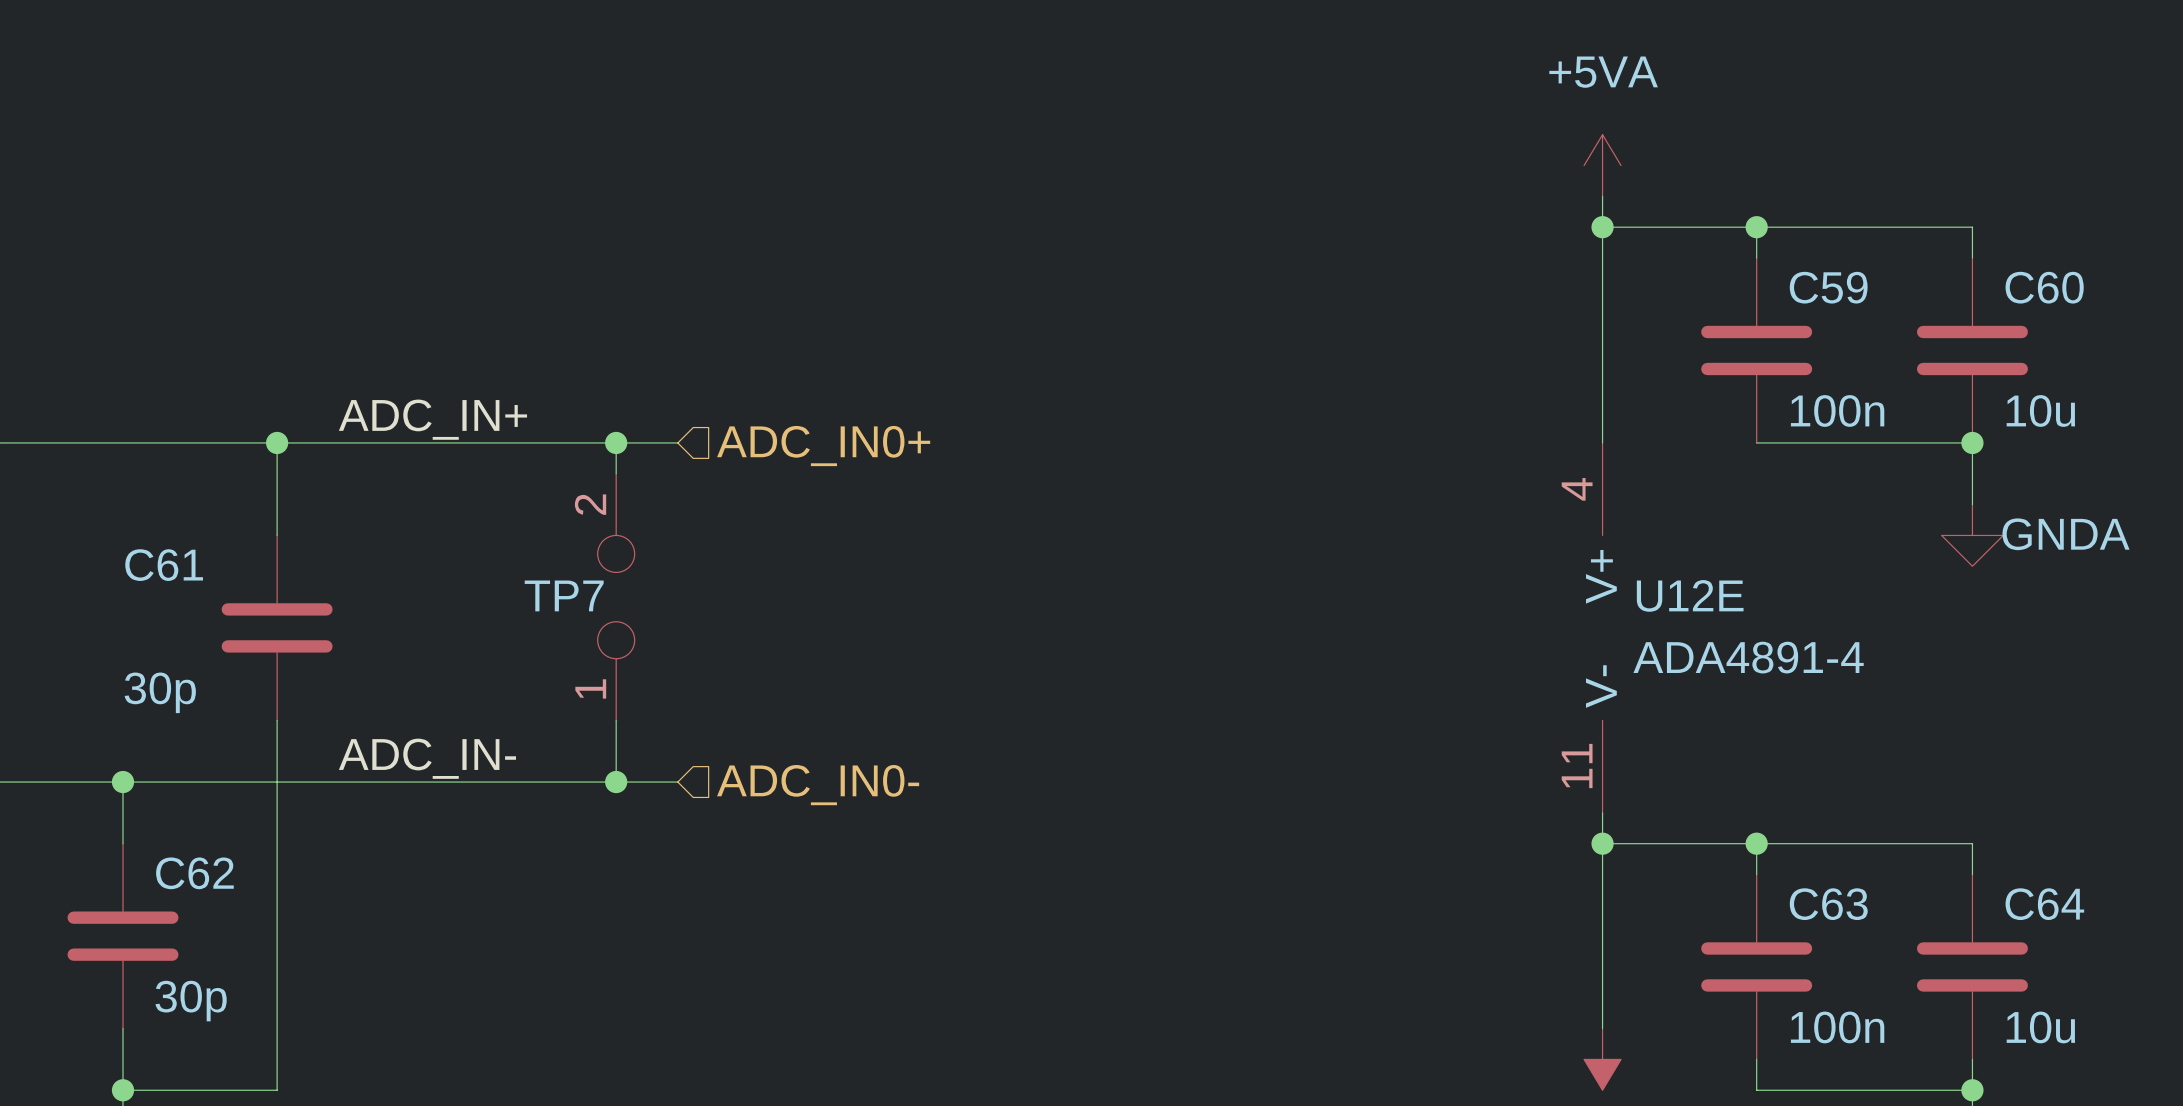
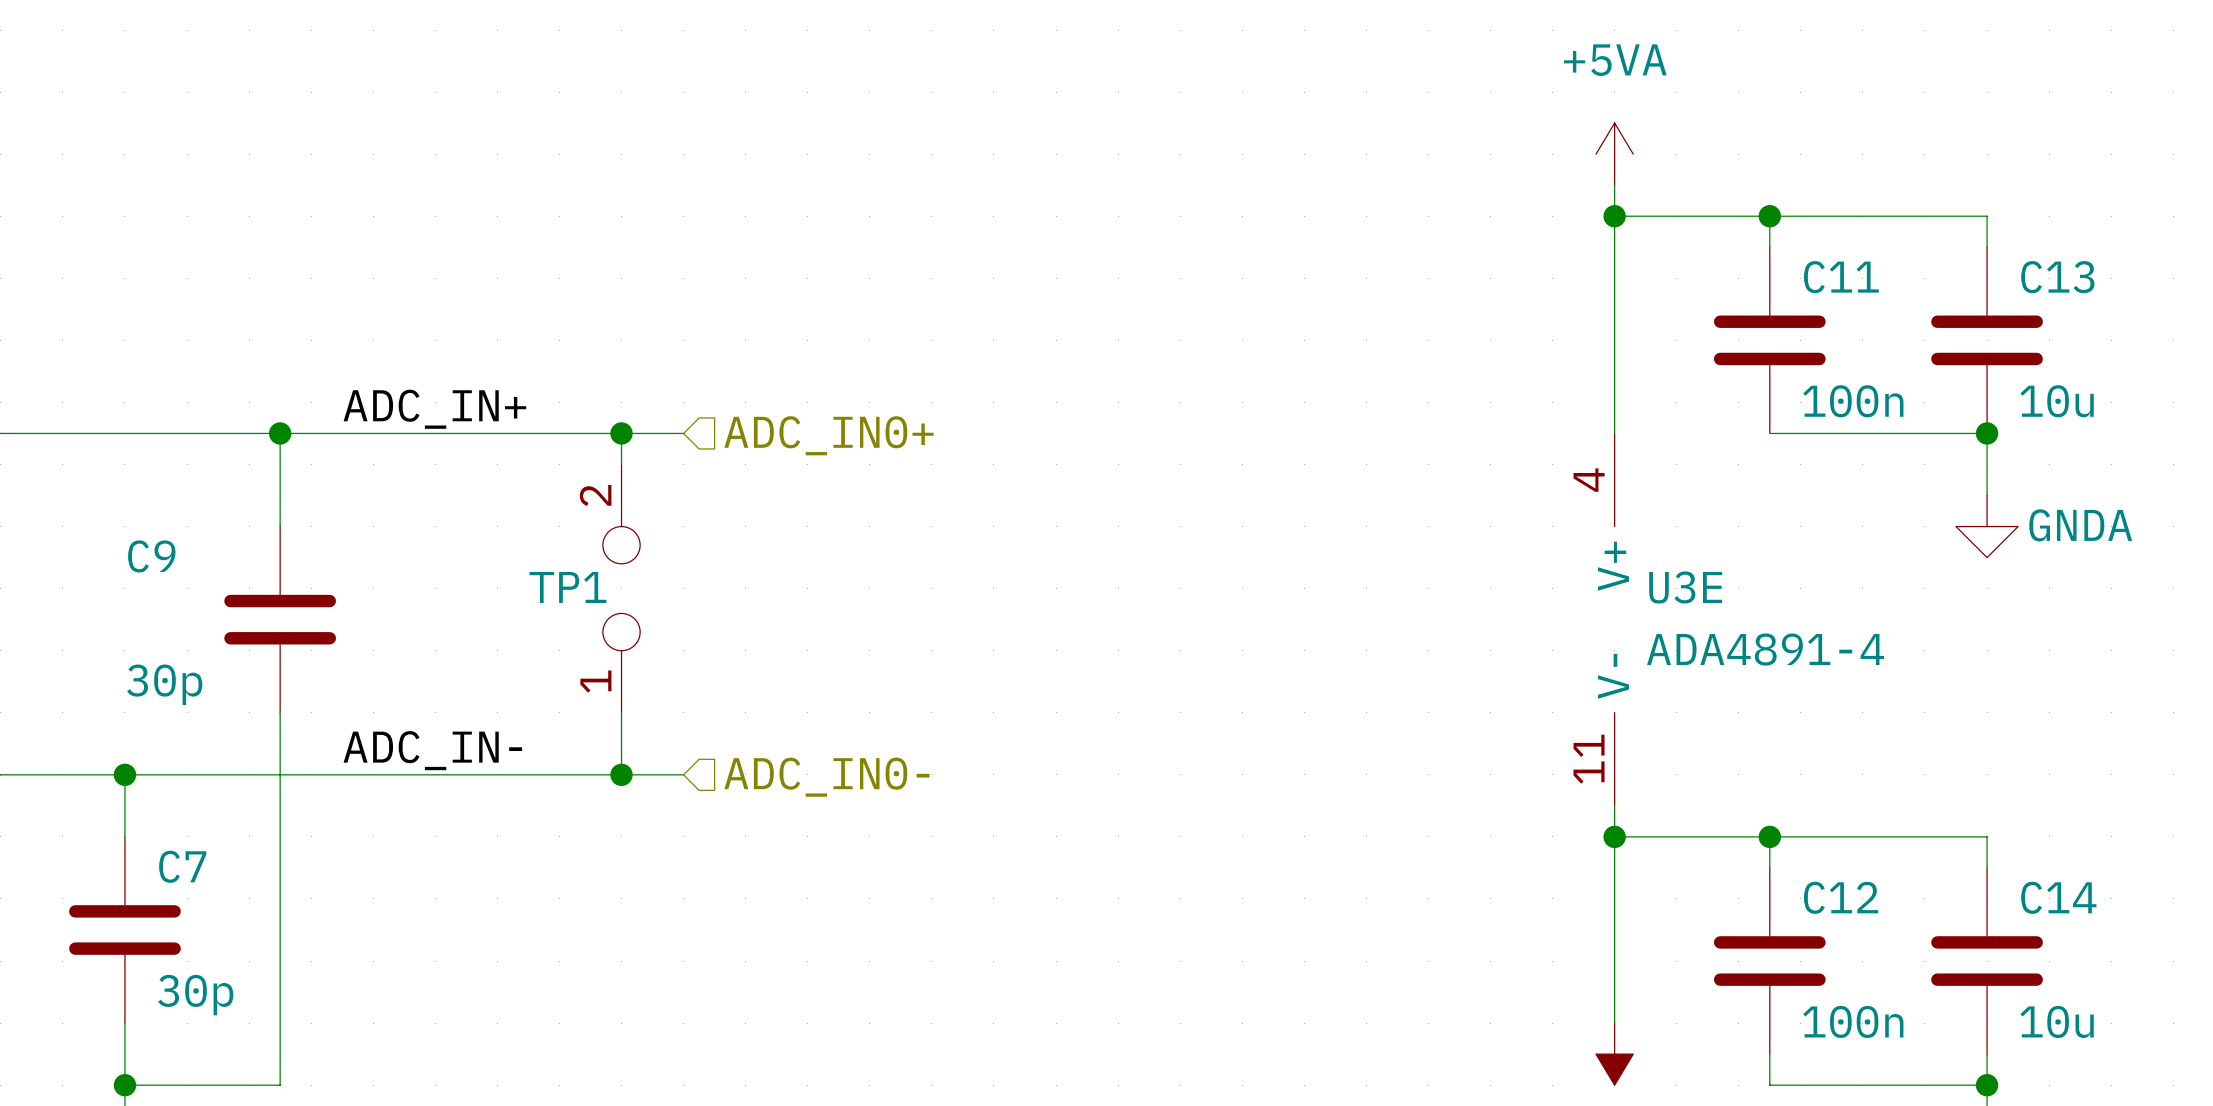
C59 name: C59 (1828, 287) -> C11 (1841, 277)
C60 name: C60 (2044, 287) -> C13 (2057, 277)
C61 name: C61 (164, 565) -> C9 (151, 556)
TP7 name: TP7 (564, 595) -> TP1 (567, 587)
U12E name: U12E (1690, 595) -> U3E (1685, 587)
C62 name: C62 (194, 873) -> C7 (182, 866)
C63 name: C63 (1828, 904) -> C12 (1841, 897)
C64 name: C64 (2044, 904) -> C14 (2058, 897)

